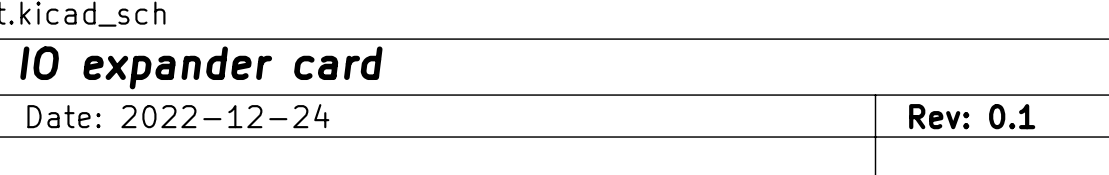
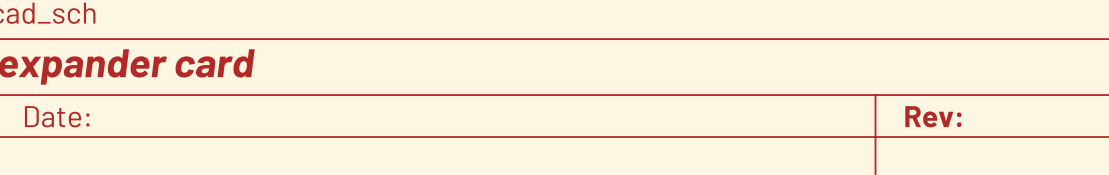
title block: Date: 2022-12-24 (178, 116) -> Date: (57, 116)
title block: Rev: 0.1 (972, 116) -> Rev: (933, 116)

